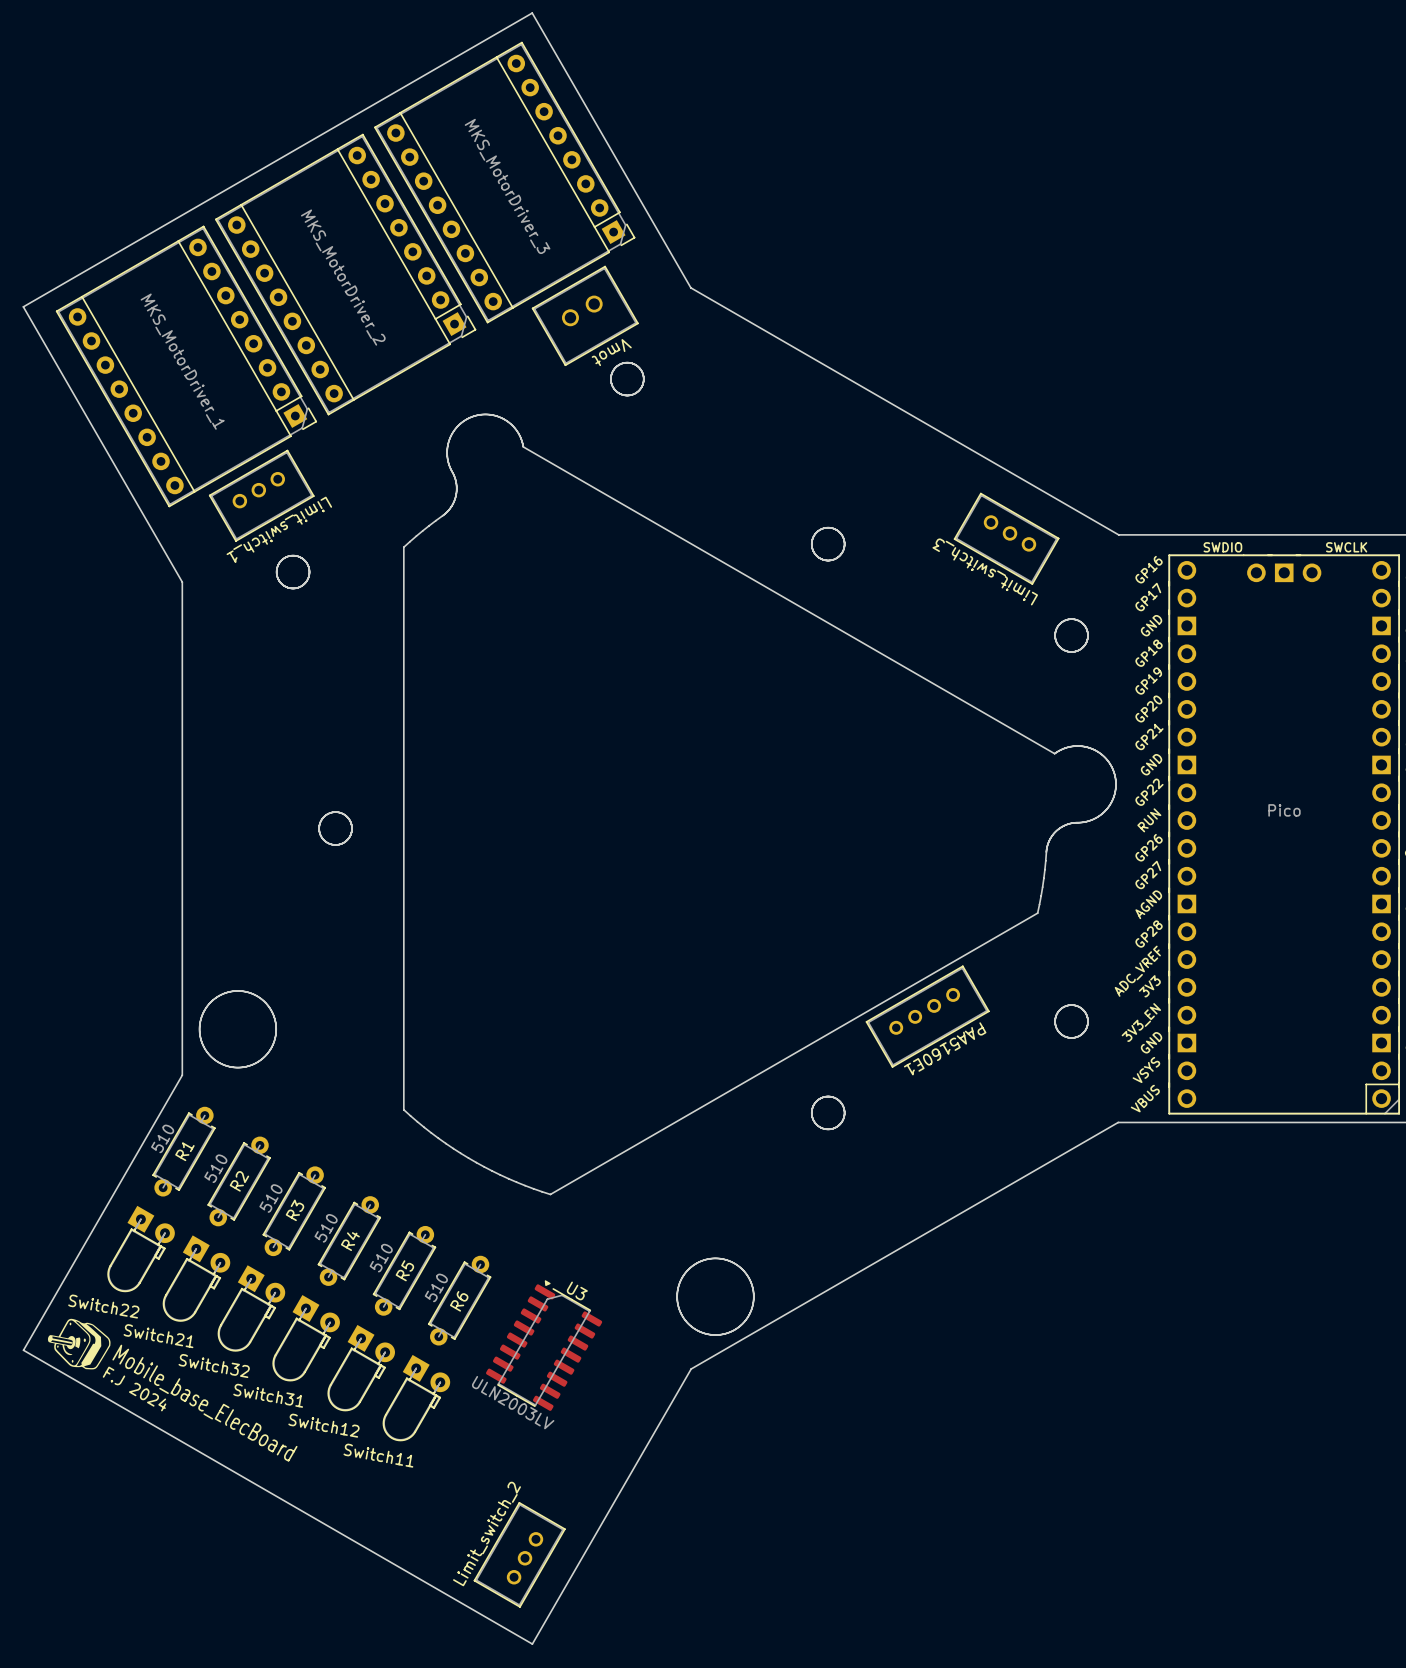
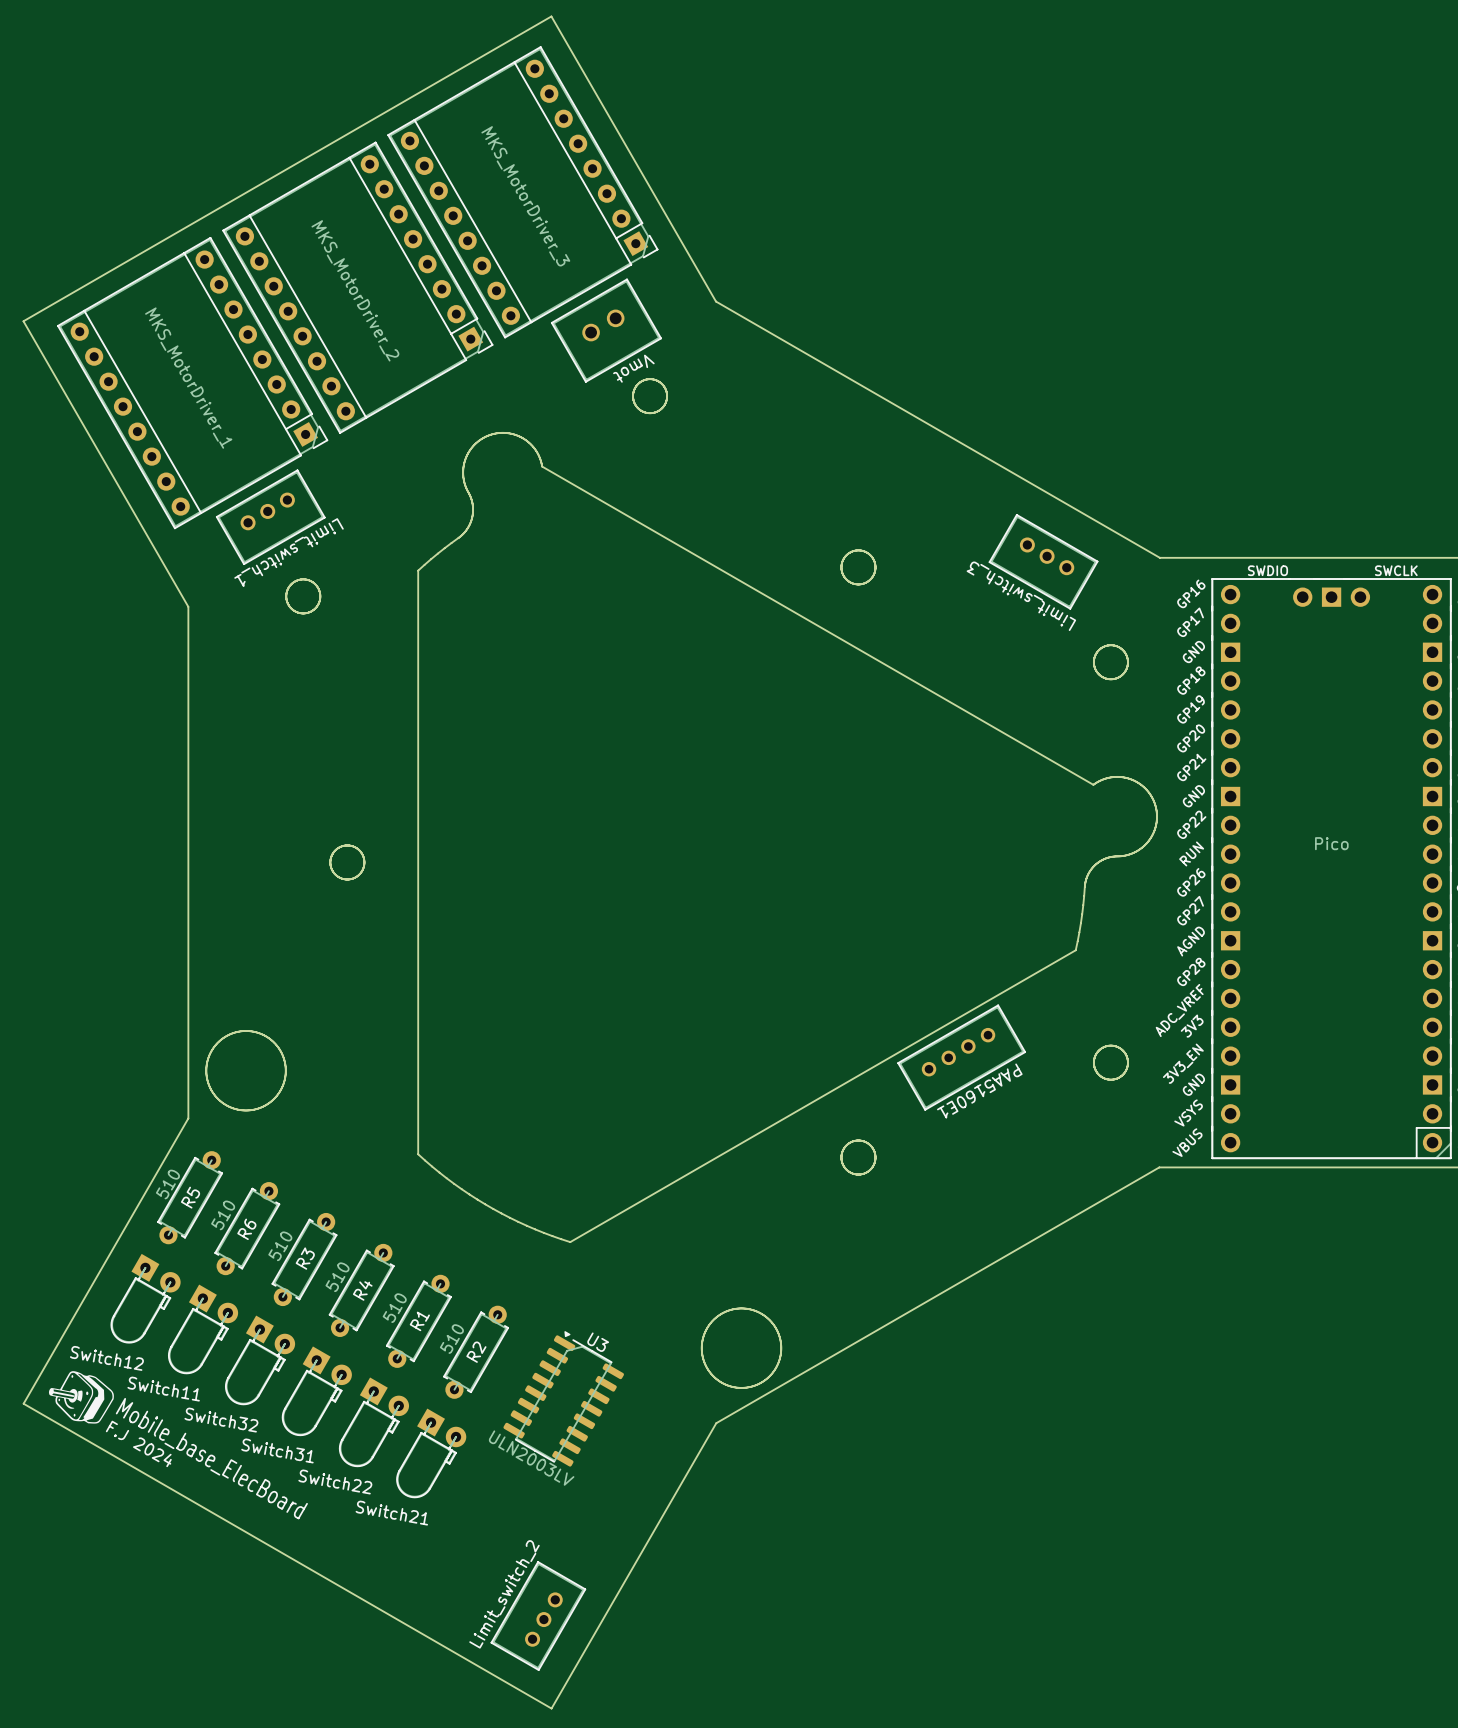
R1 name: R1 (184, 1151) -> R5 (190, 1197)
R2 name: R2 (239, 1181) -> R6 (246, 1229)
R5 name: R5 (404, 1270) -> R1 (419, 1321)
R6 name: R6 (459, 1301) -> R2 (476, 1352)
Switch22 name: Switch22 (103, 1306) -> Switch12 (106, 1358)
Switch21 name: Switch21 (158, 1336) -> Switch11 (163, 1389)
Switch12 name: Switch12 (323, 1425) -> Switch22 (335, 1481)
Switch11 name: Switch11 (378, 1455) -> Switch21 (391, 1513)

